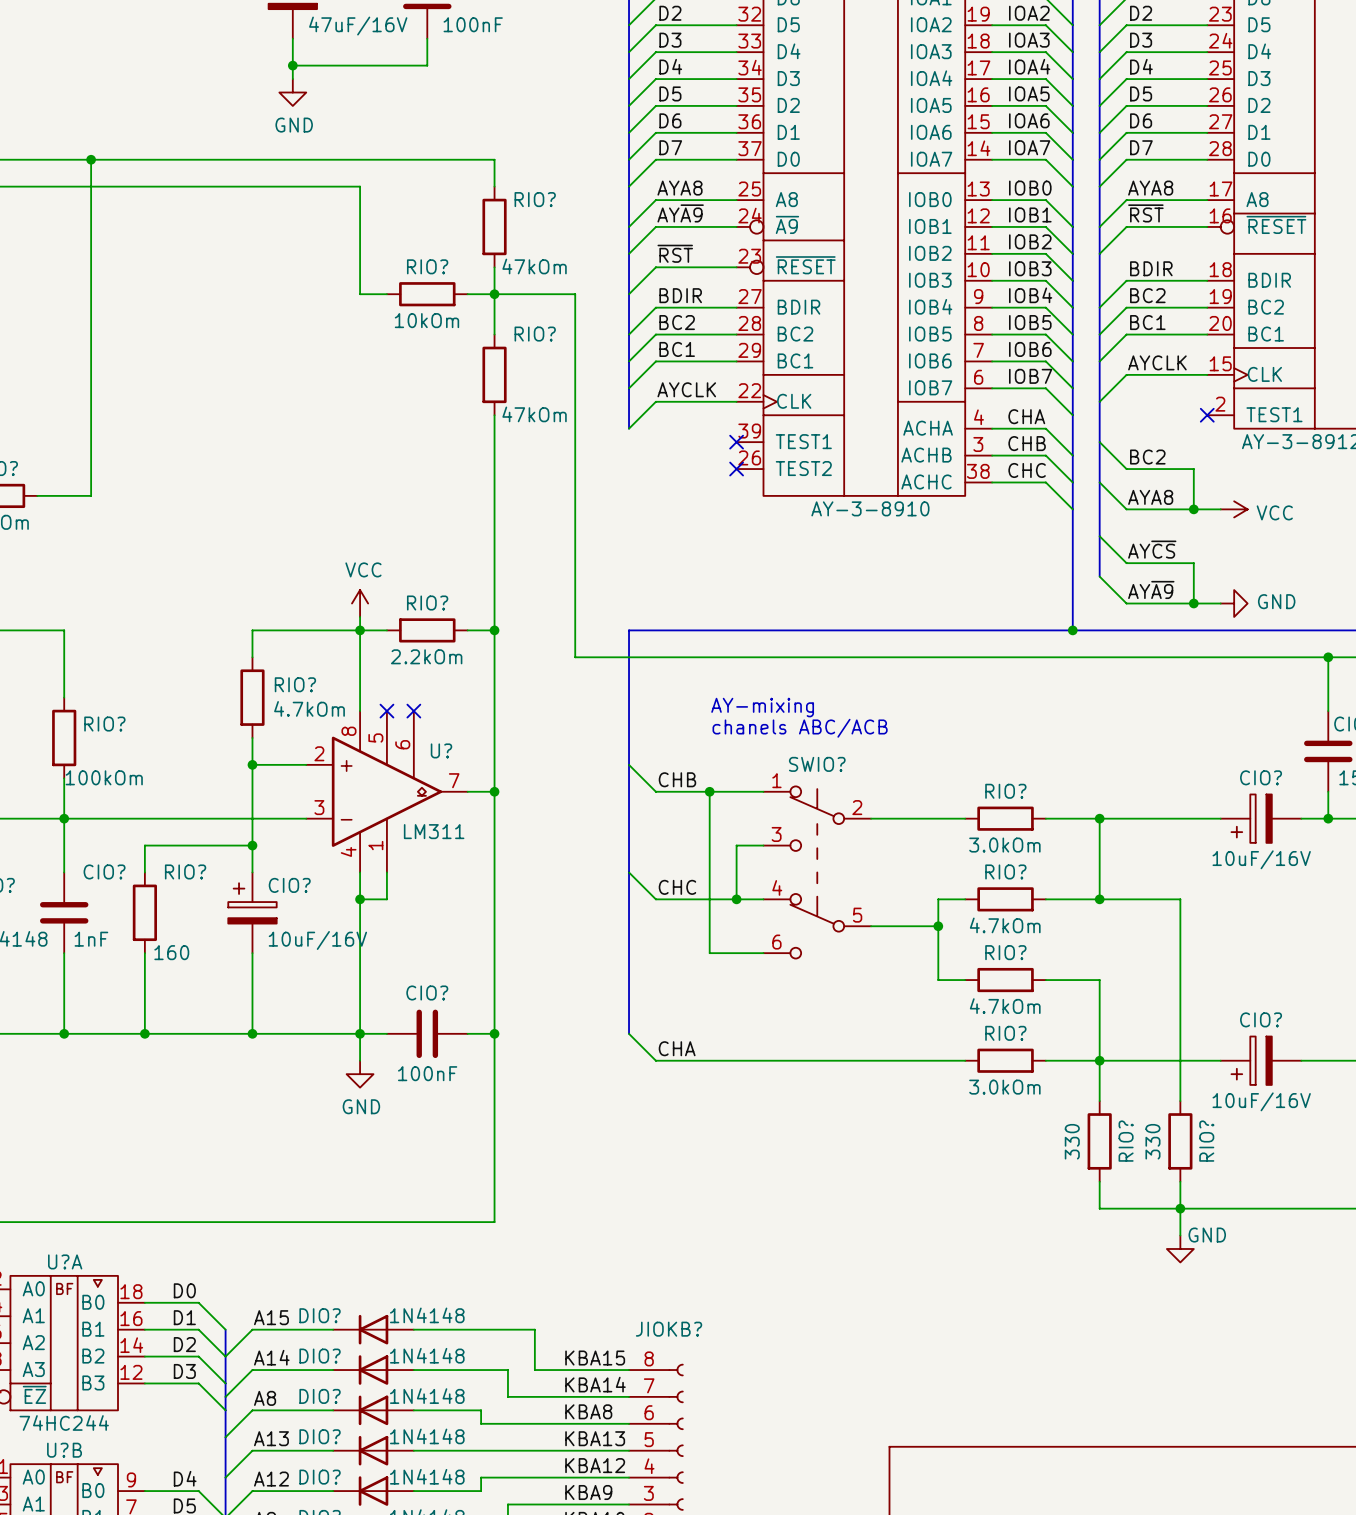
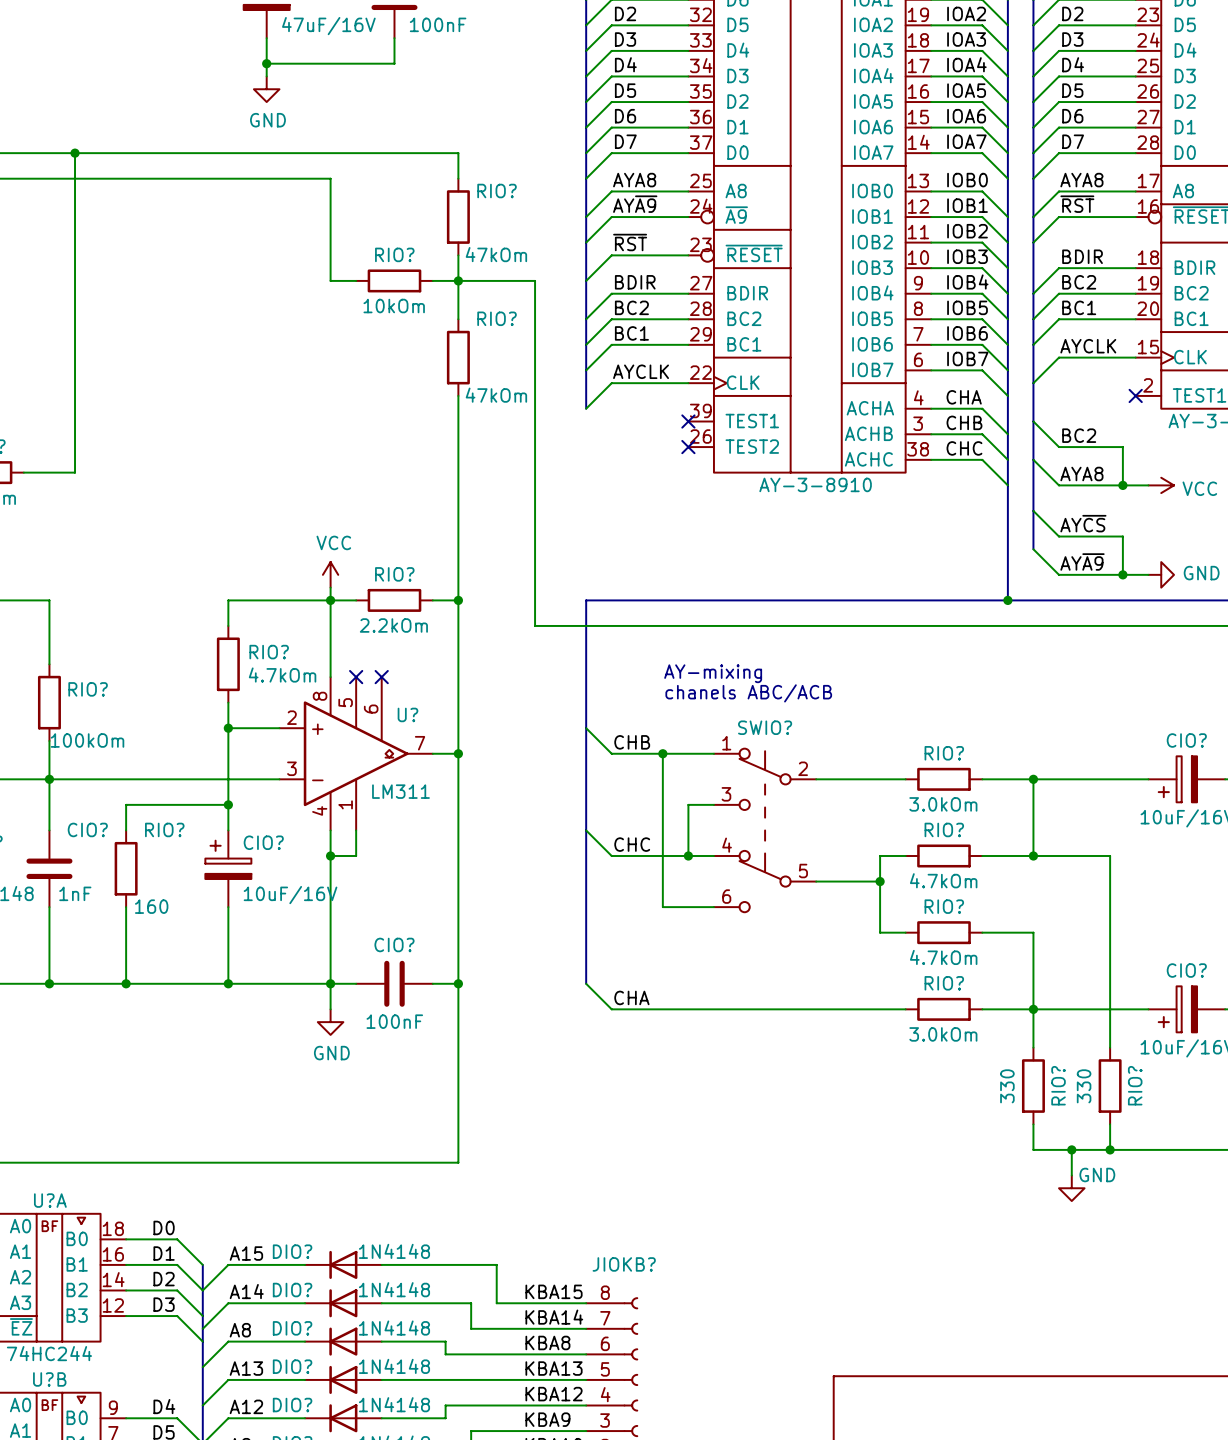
junction: none -> (1071, 1149)
wire: (1180, 1208) (1180, 1235) -> (1071, 1149) (1071, 1175)
power symbol position: GND (1180, 1248) -> GND (1071, 1188)

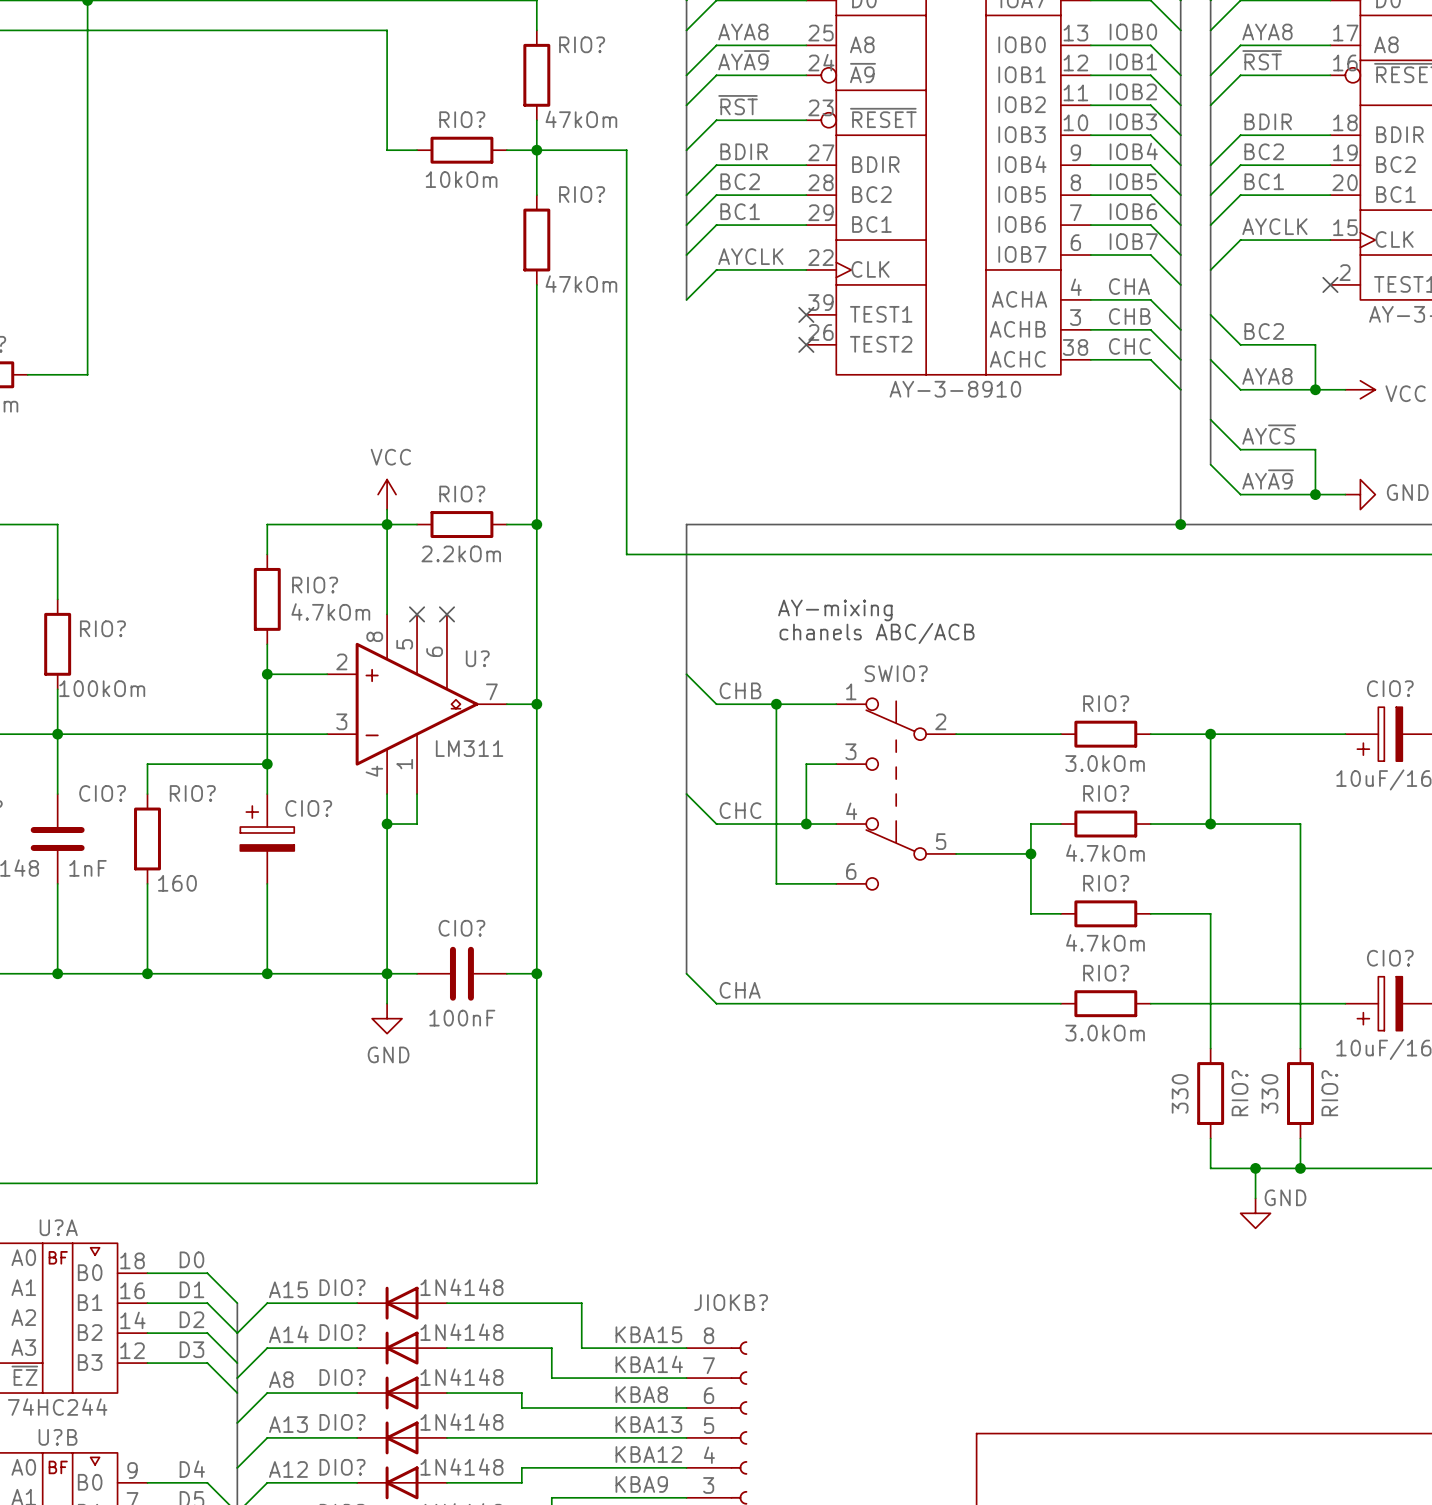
CIO? value: 10uF/16V (290, 895) -> none
junction: (1033, 1009) -> none

